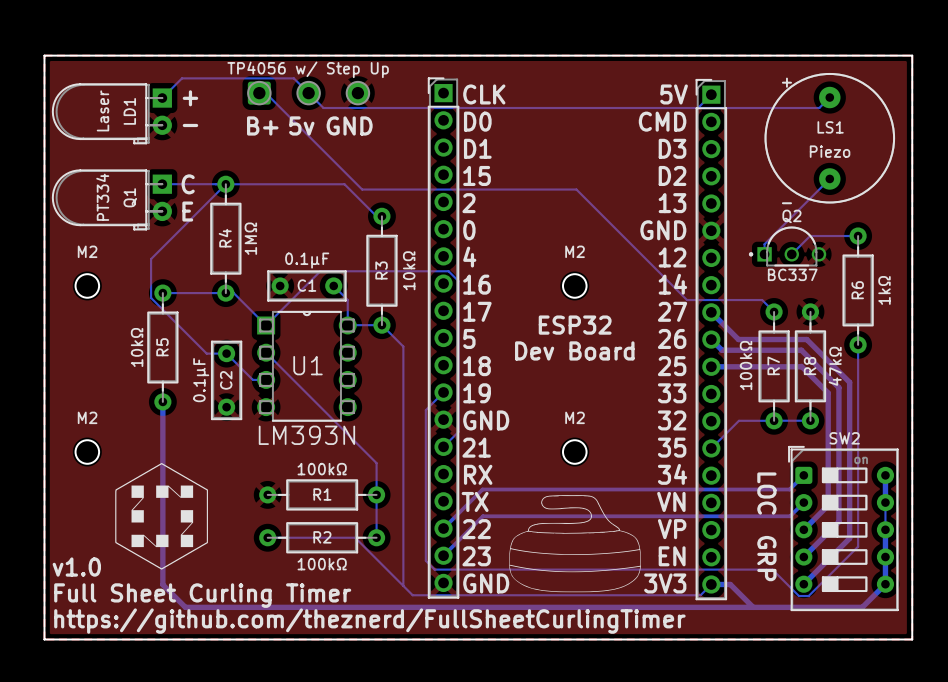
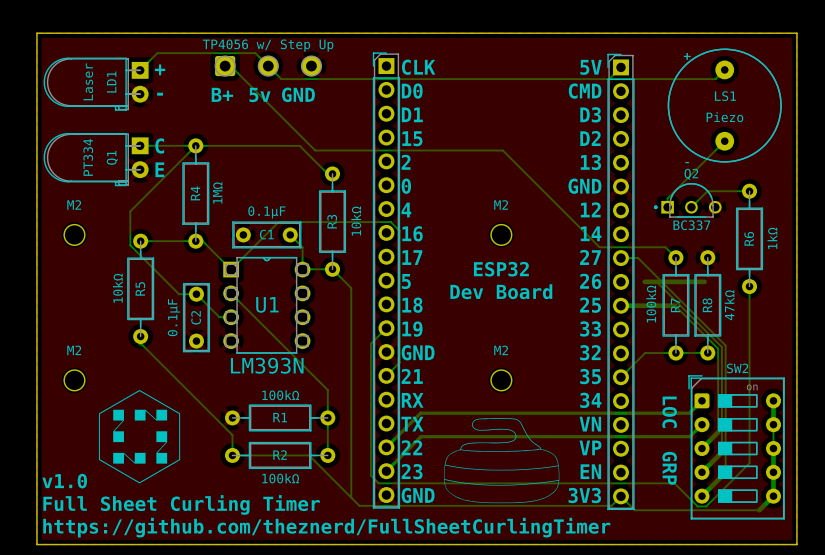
bottom track: (711, 312) (738, 339) -> none
bottom track: (711, 339) (722, 350) (801, 350) (838, 387) (838, 521) (826, 534) -> (656, 281) (721, 347) (721, 452)
bottom track: (806, 339) (849, 382) (849, 538) (830, 557) -> (620, 258) (638, 258) (725, 345) (725, 472)
bottom track: (773, 366) (801, 366) (828, 393) (828, 505) (822, 511) -> (675, 305) (718, 348) (718, 432)
bottom track: (162, 409) (162, 584) (185, 607) (862, 607) (869, 600) -> (140, 343) (232, 435) (232, 455)
bottom track: (711, 584) (730, 584) (753, 607) -> (620, 496) (634, 510) (759, 510)

